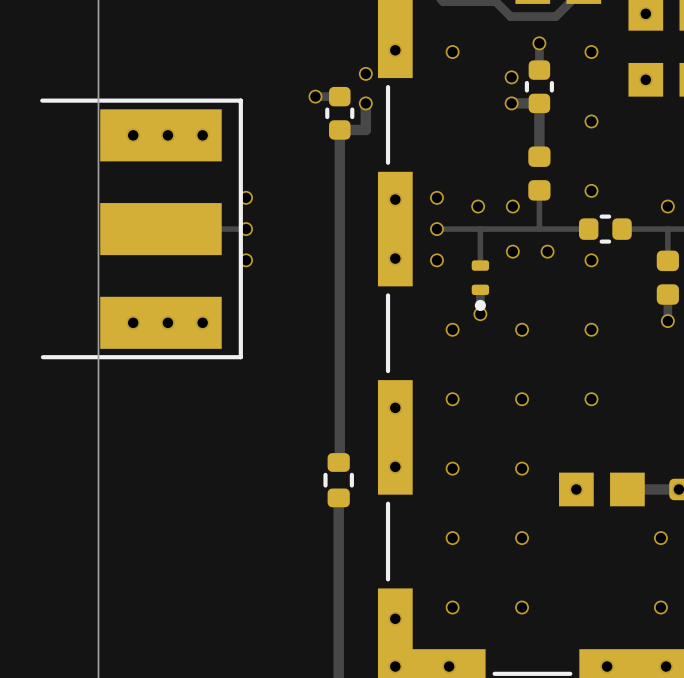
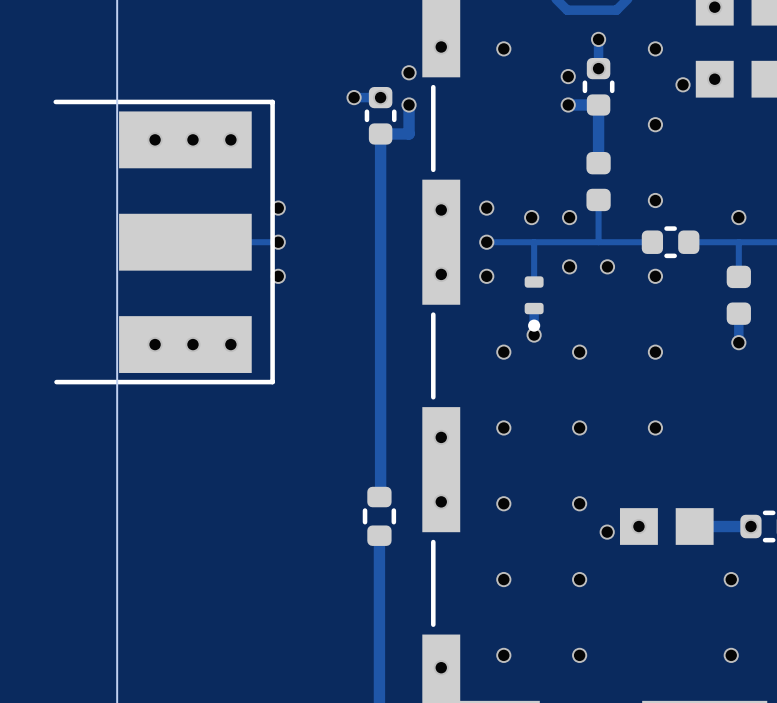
via: none -> (598, 68)
via: none -> (683, 84)
via: none -> (380, 97)
via: none -> (607, 532)

